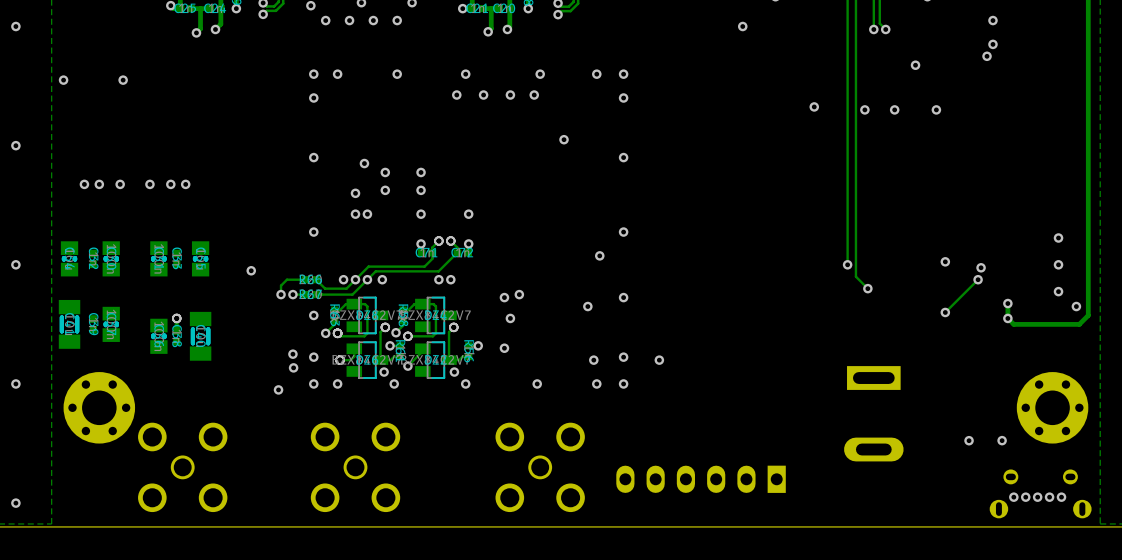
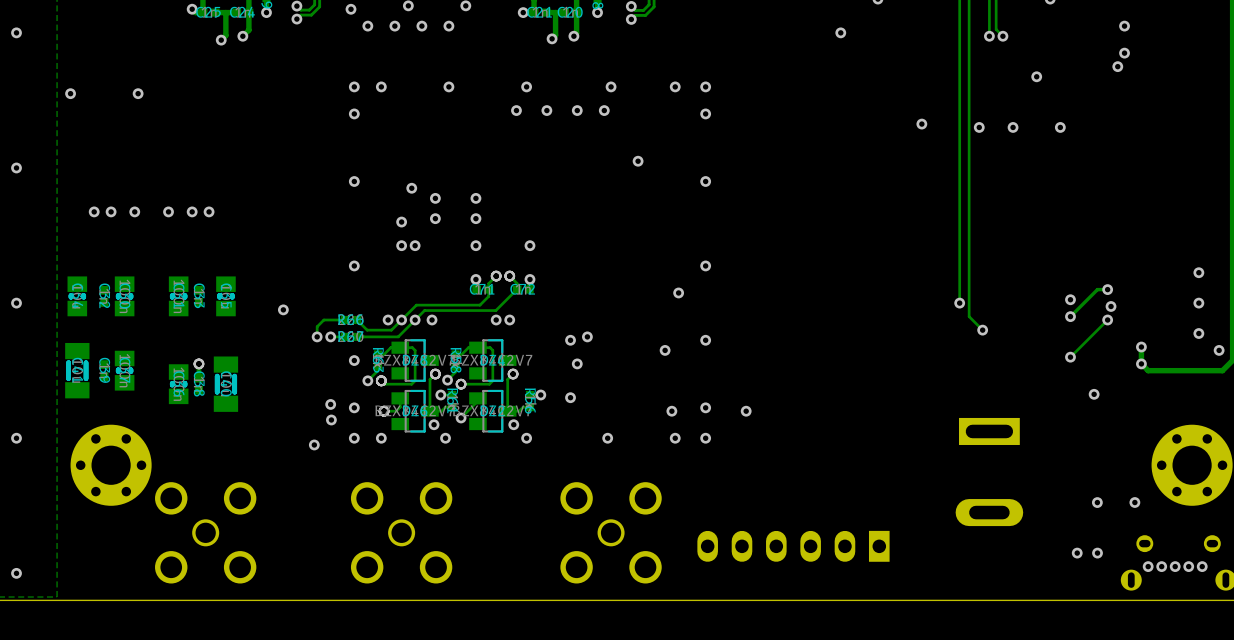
track: none -> (1107, 289) (1097, 289) (1070, 316)
via: none -> (1107, 289)
via: none -> (1070, 316)
via: none -> (1094, 394)
via: none -> (1077, 553)
via: none -> (1097, 553)

